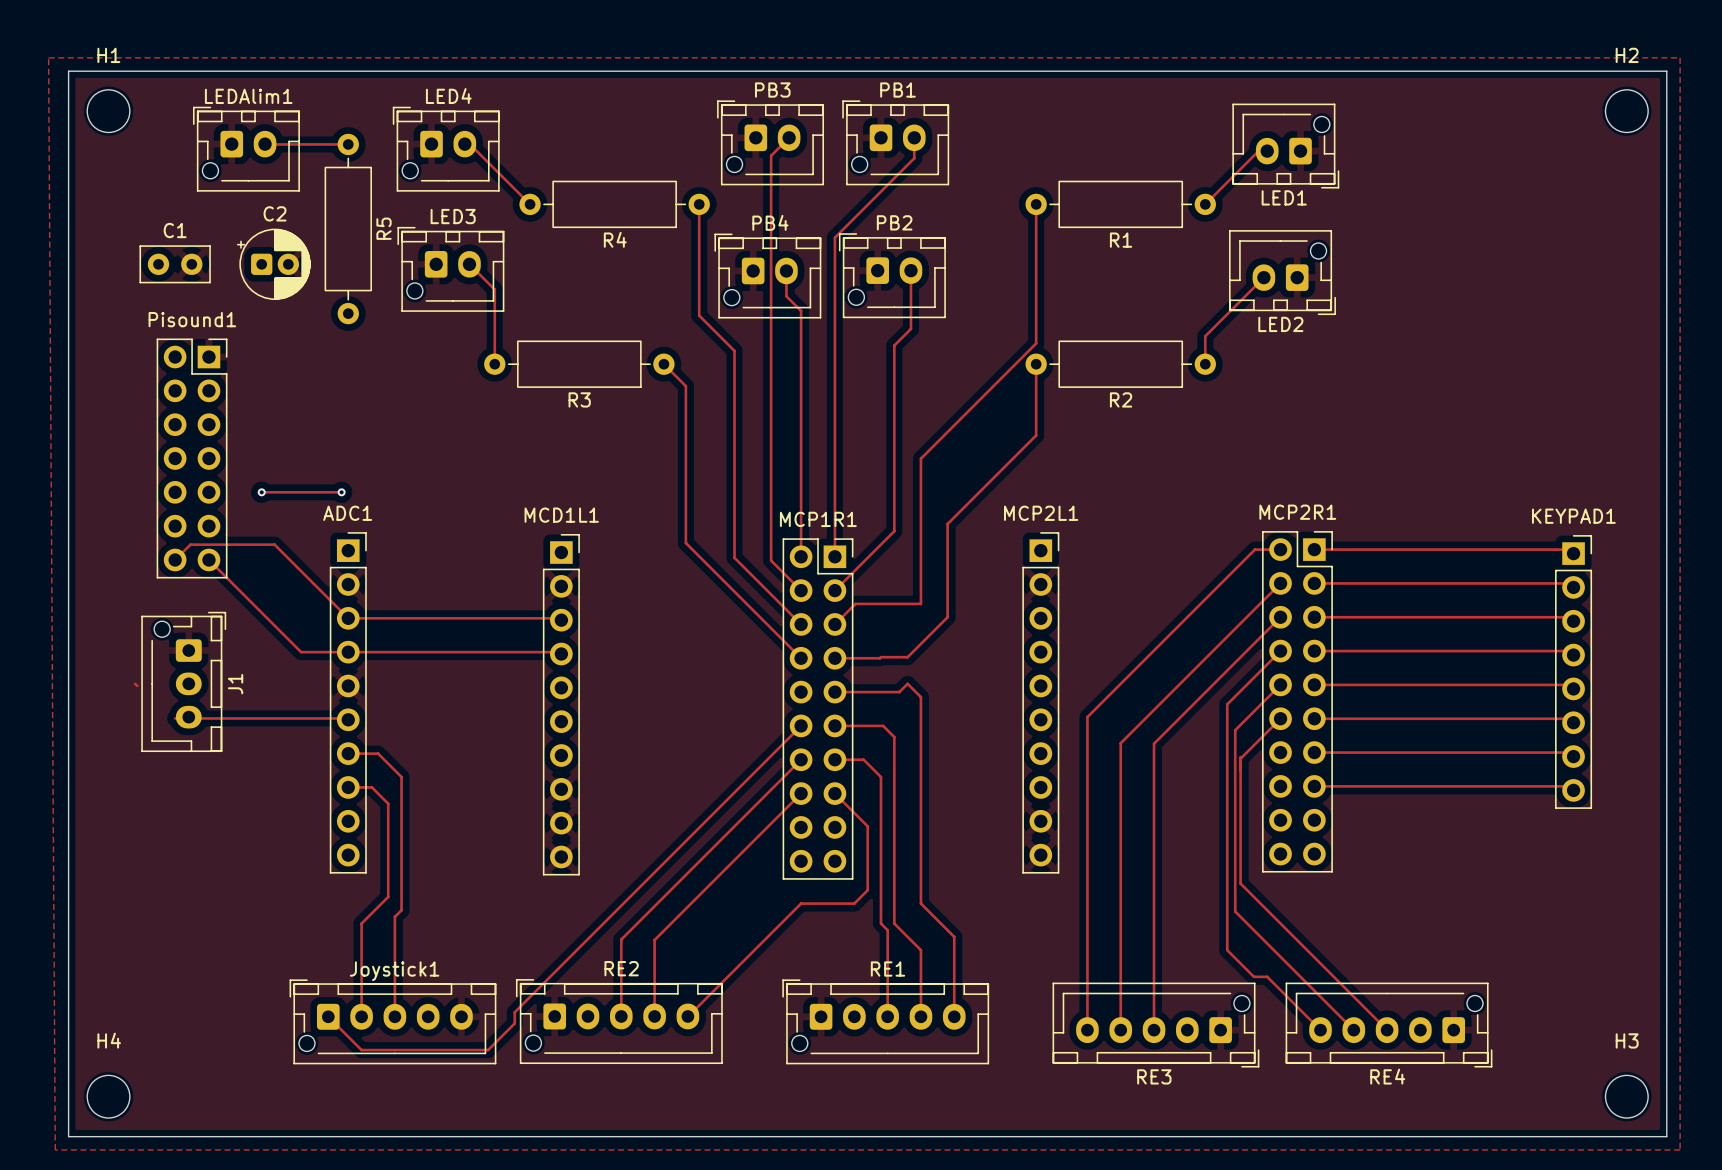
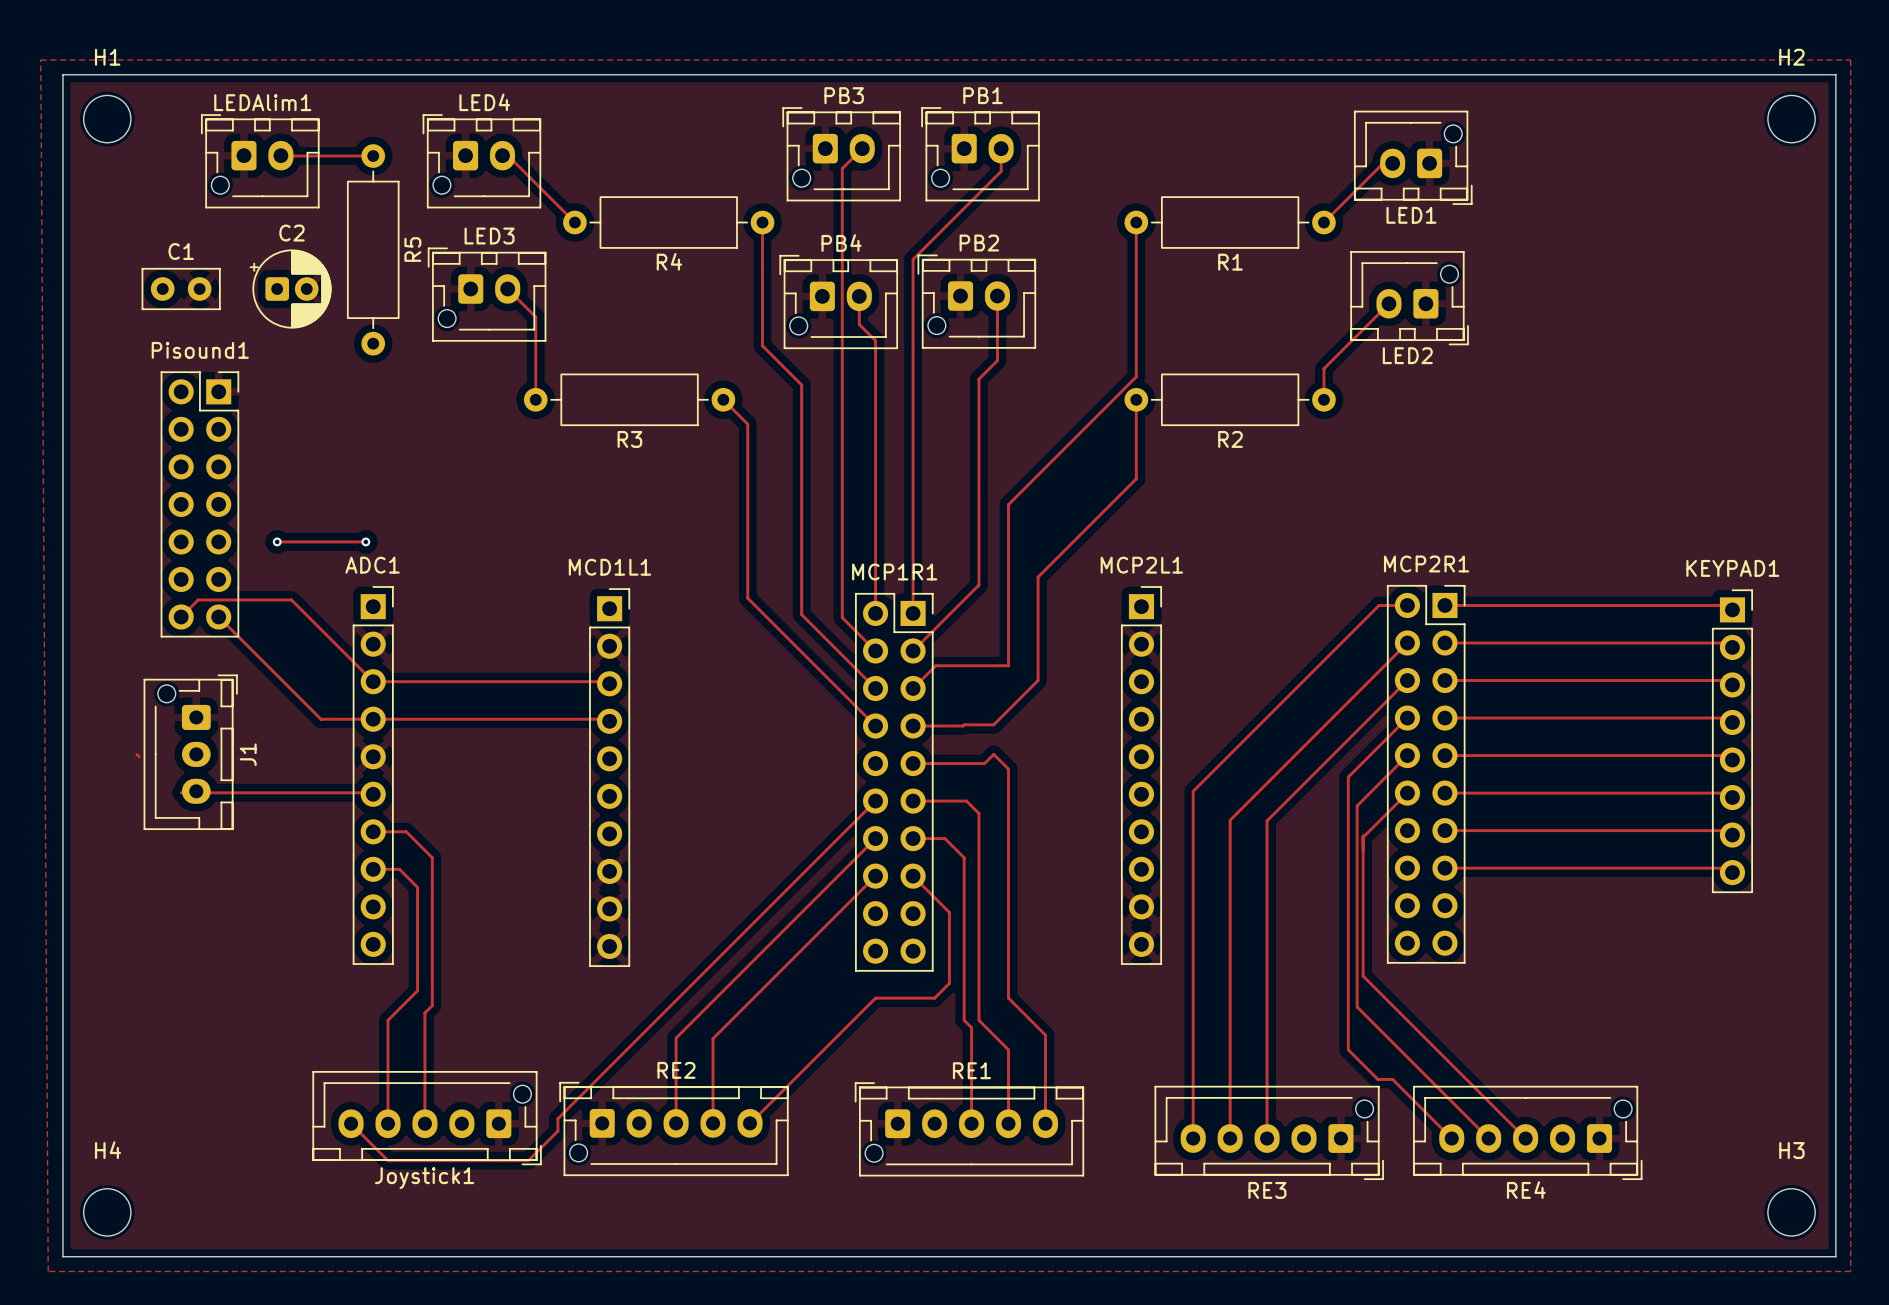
Joystick1 rotation: 0° (392, 1021) -> 180° (427, 1118)

